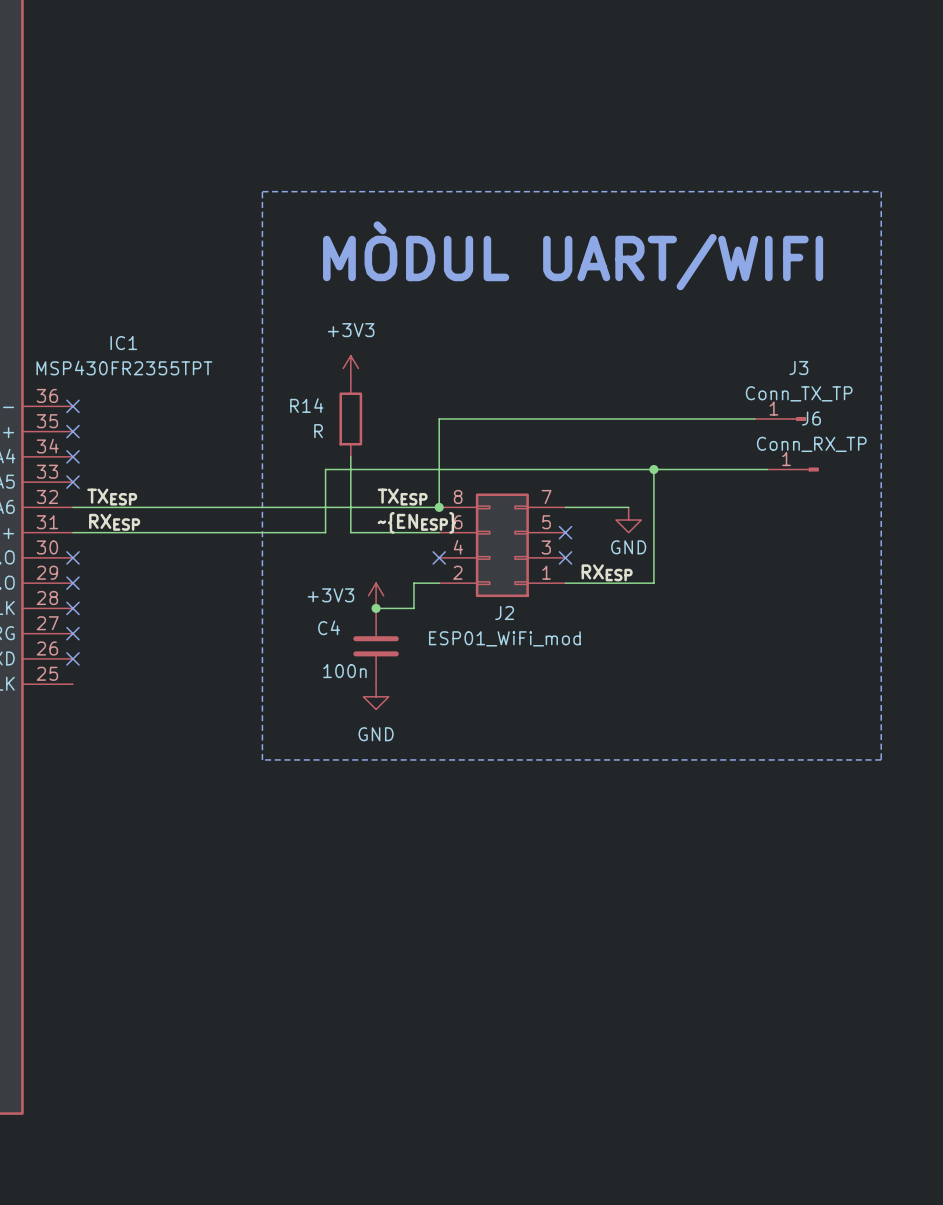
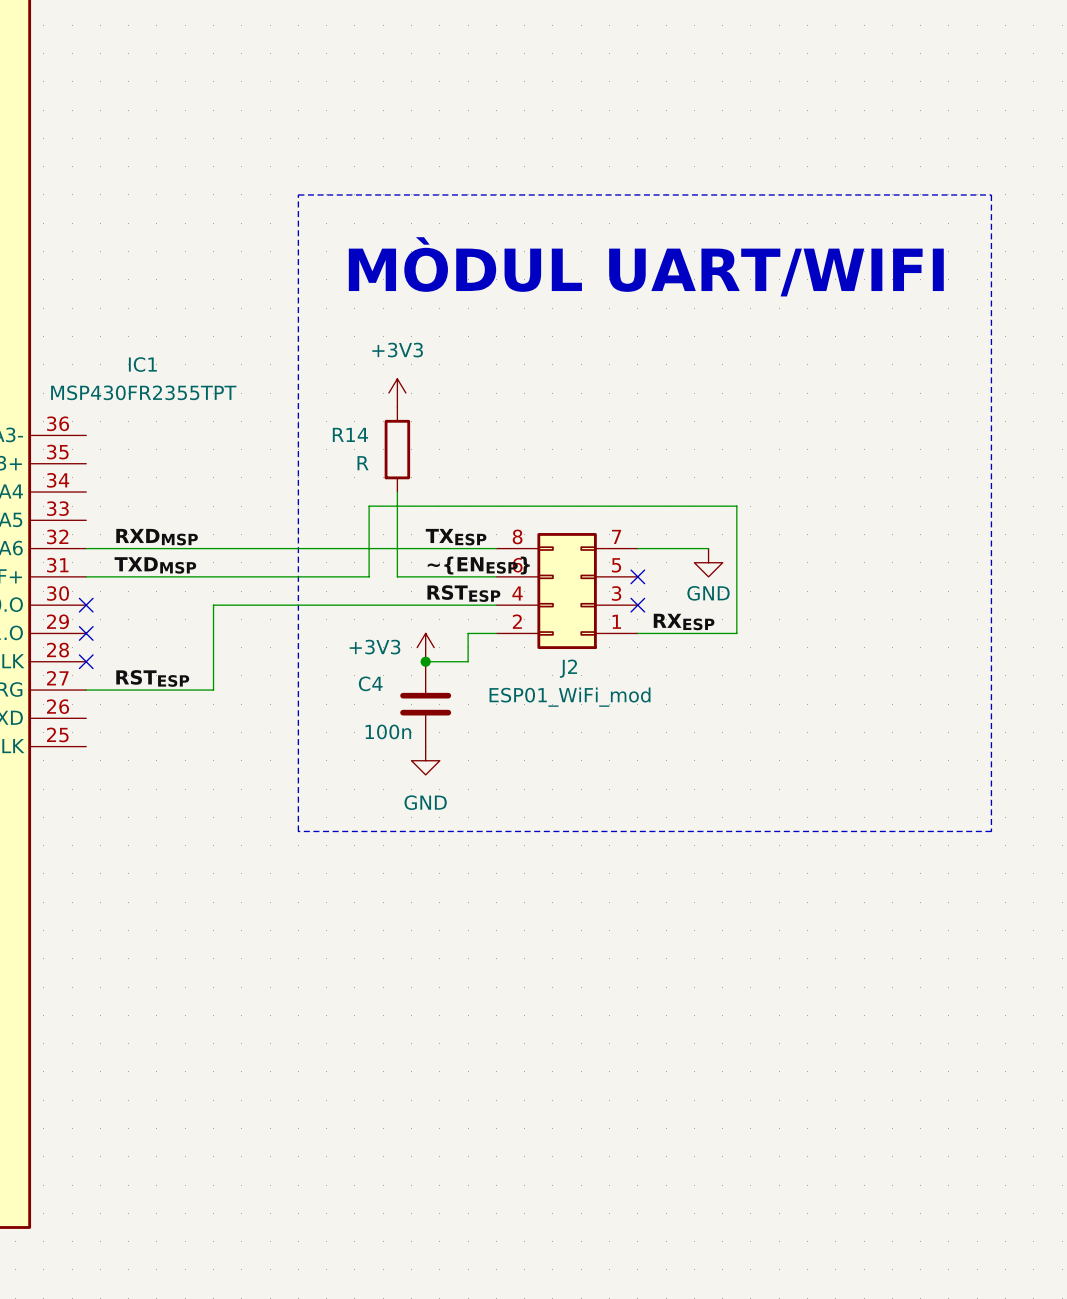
no-connect mark: (72, 406) -> none
wire: (754, 418) (439, 418) (439, 507) -> none
J3: Conn_TX_TP (780, 418) -> none
no-connect mark: (72, 431) -> none
no-connect mark: (72, 456) -> none
wire: (653, 469) (767, 469) -> none
junction: (653, 469) -> none
J6: Conn_RX_TP (793, 469) -> none
no-connect mark: (72, 482) -> none
label: TXESP (112, 497) -> RXDMSP (157, 537)
junction: (439, 507) -> none
label: RXESP (114, 522) -> TXDMSP (155, 565)
label: none -> RSTESP (463, 593)
wire: none -> (496, 605) (213, 605) (213, 690) (86, 690)
no-connect mark: (439, 557) -> none
label: none -> RSTESP (152, 678)
no-connect mark: (72, 633) -> none
no-connect mark: (72, 658) -> none

